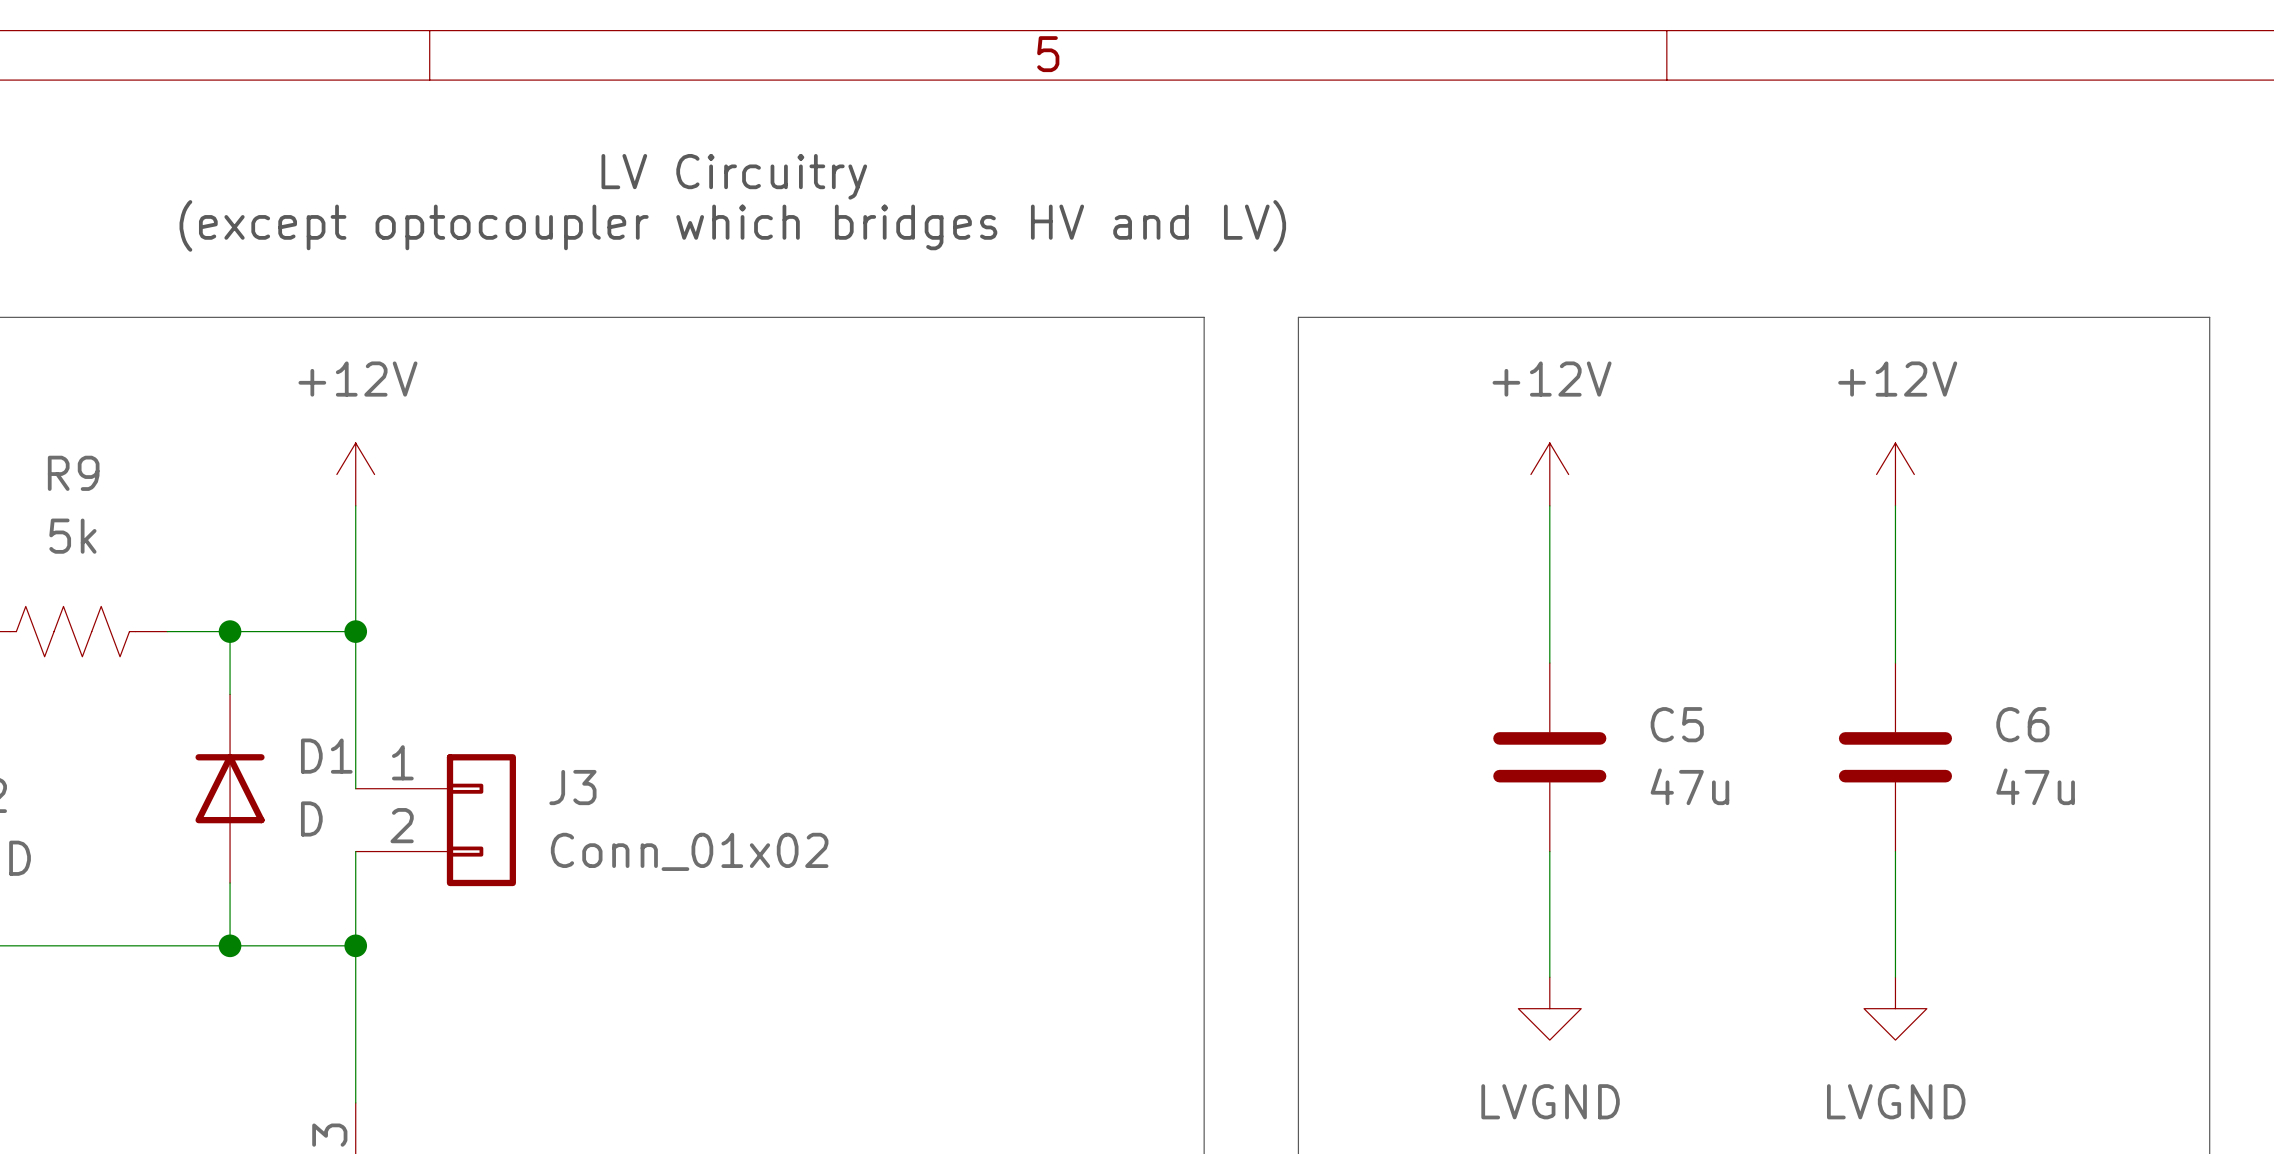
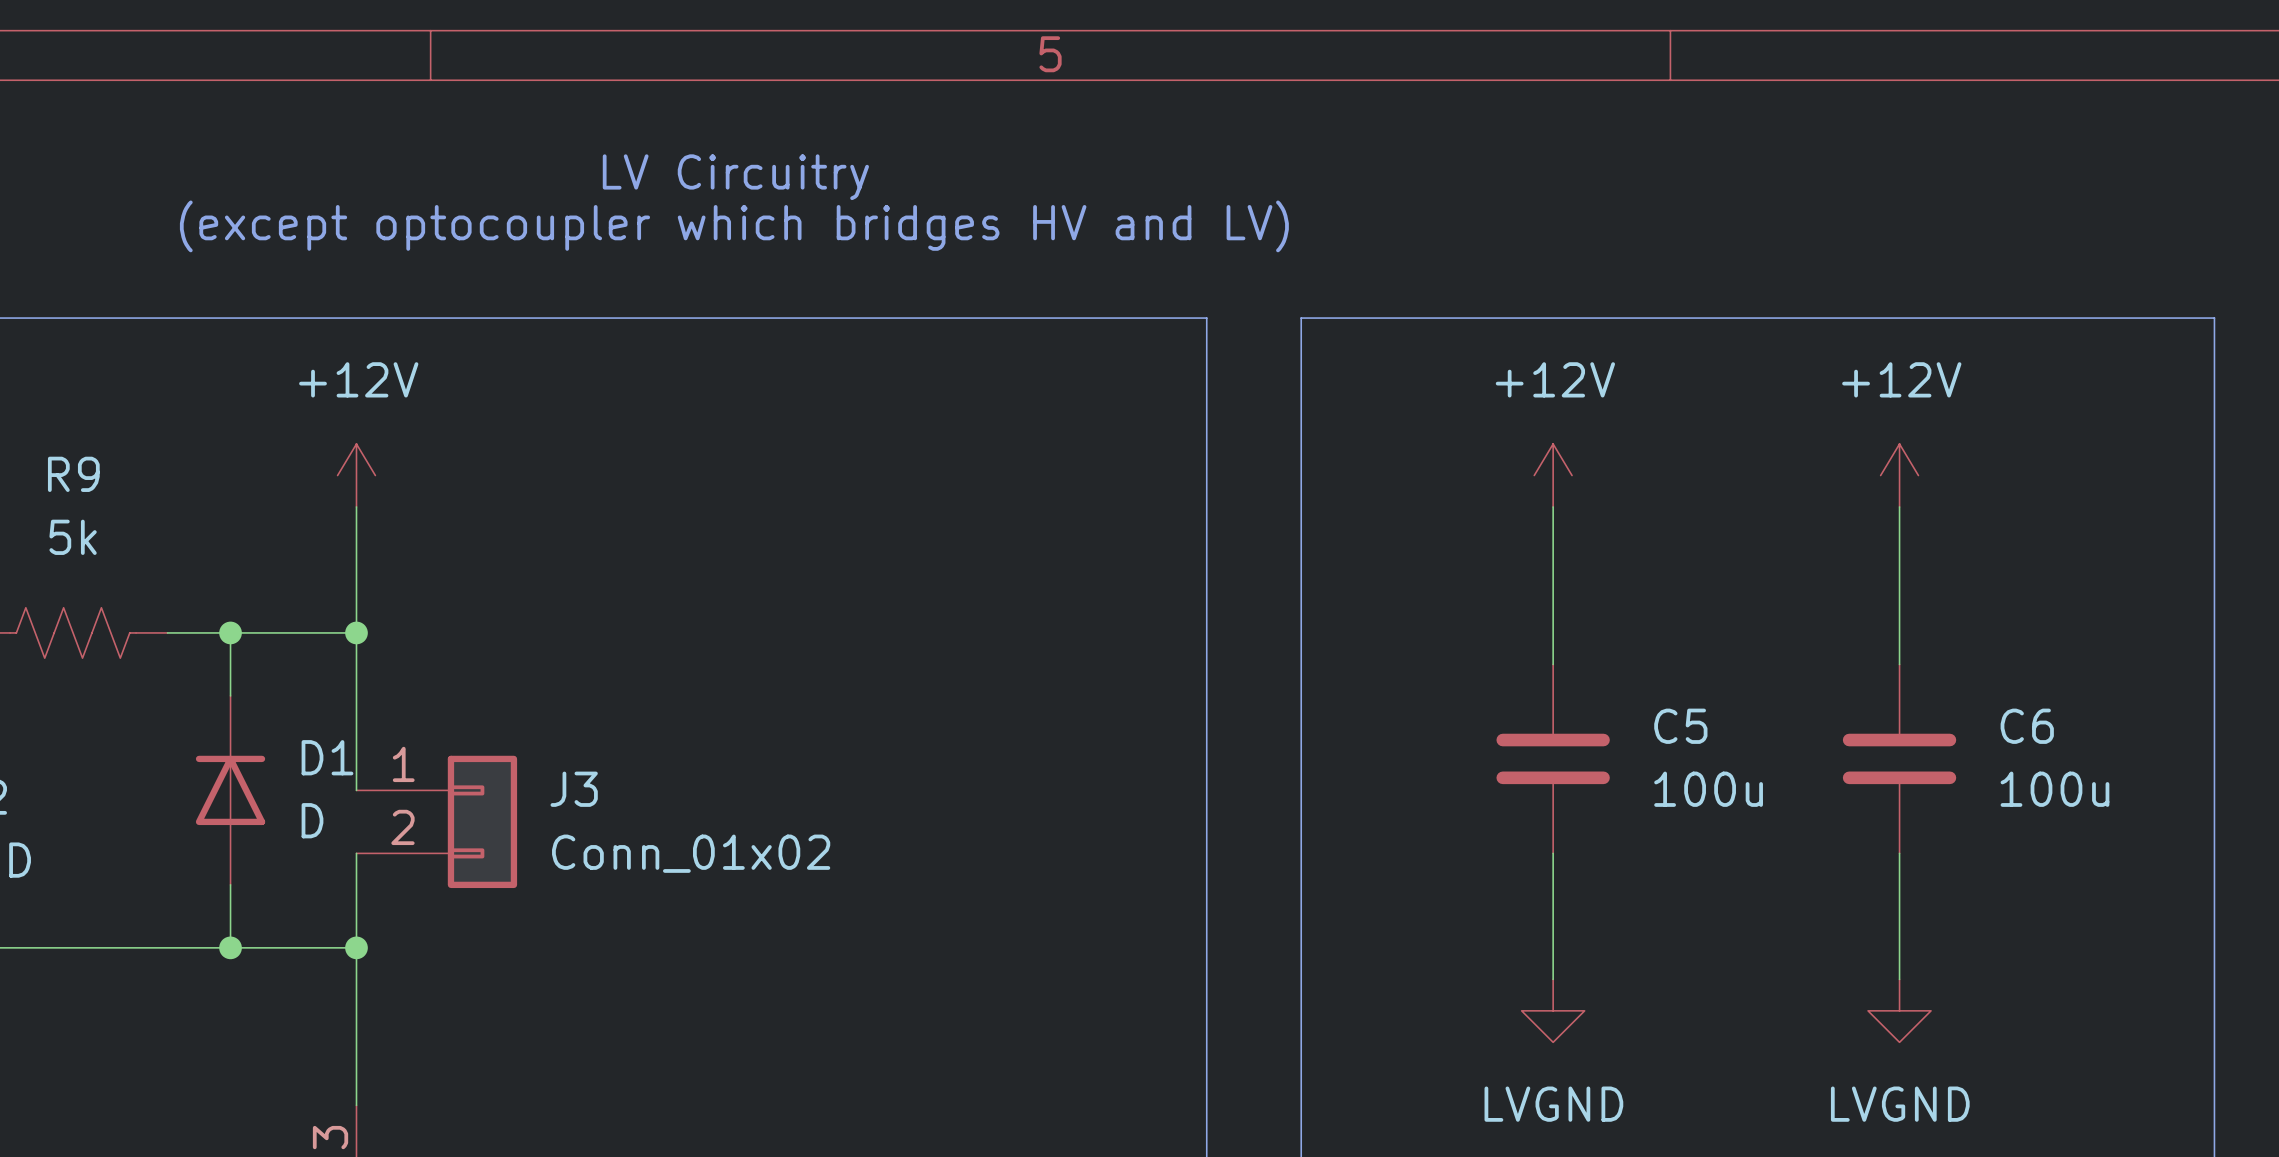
C5 value: 47u (1689, 786) -> 100u (1708, 789)
C6 value: 47u (2035, 786) -> 100u (2054, 789)

